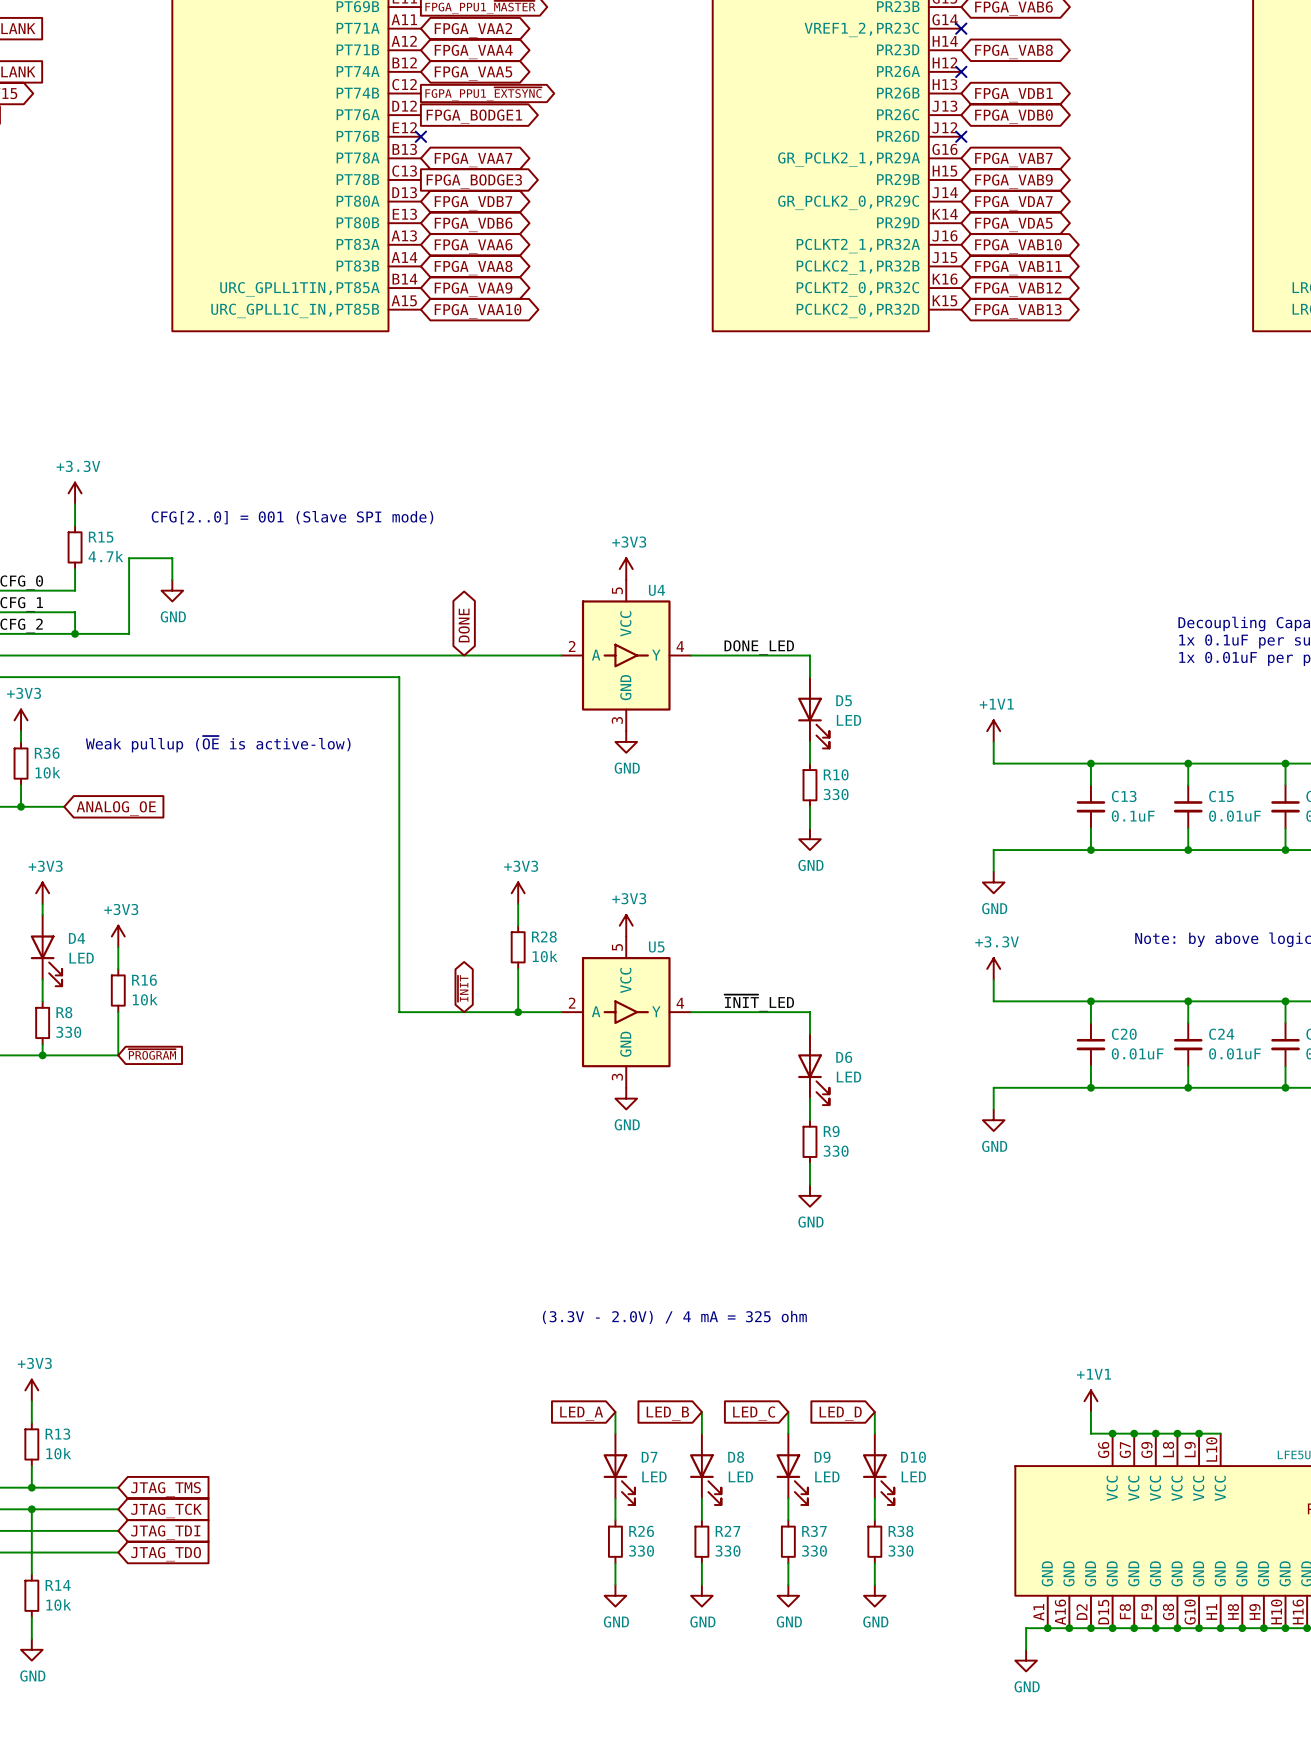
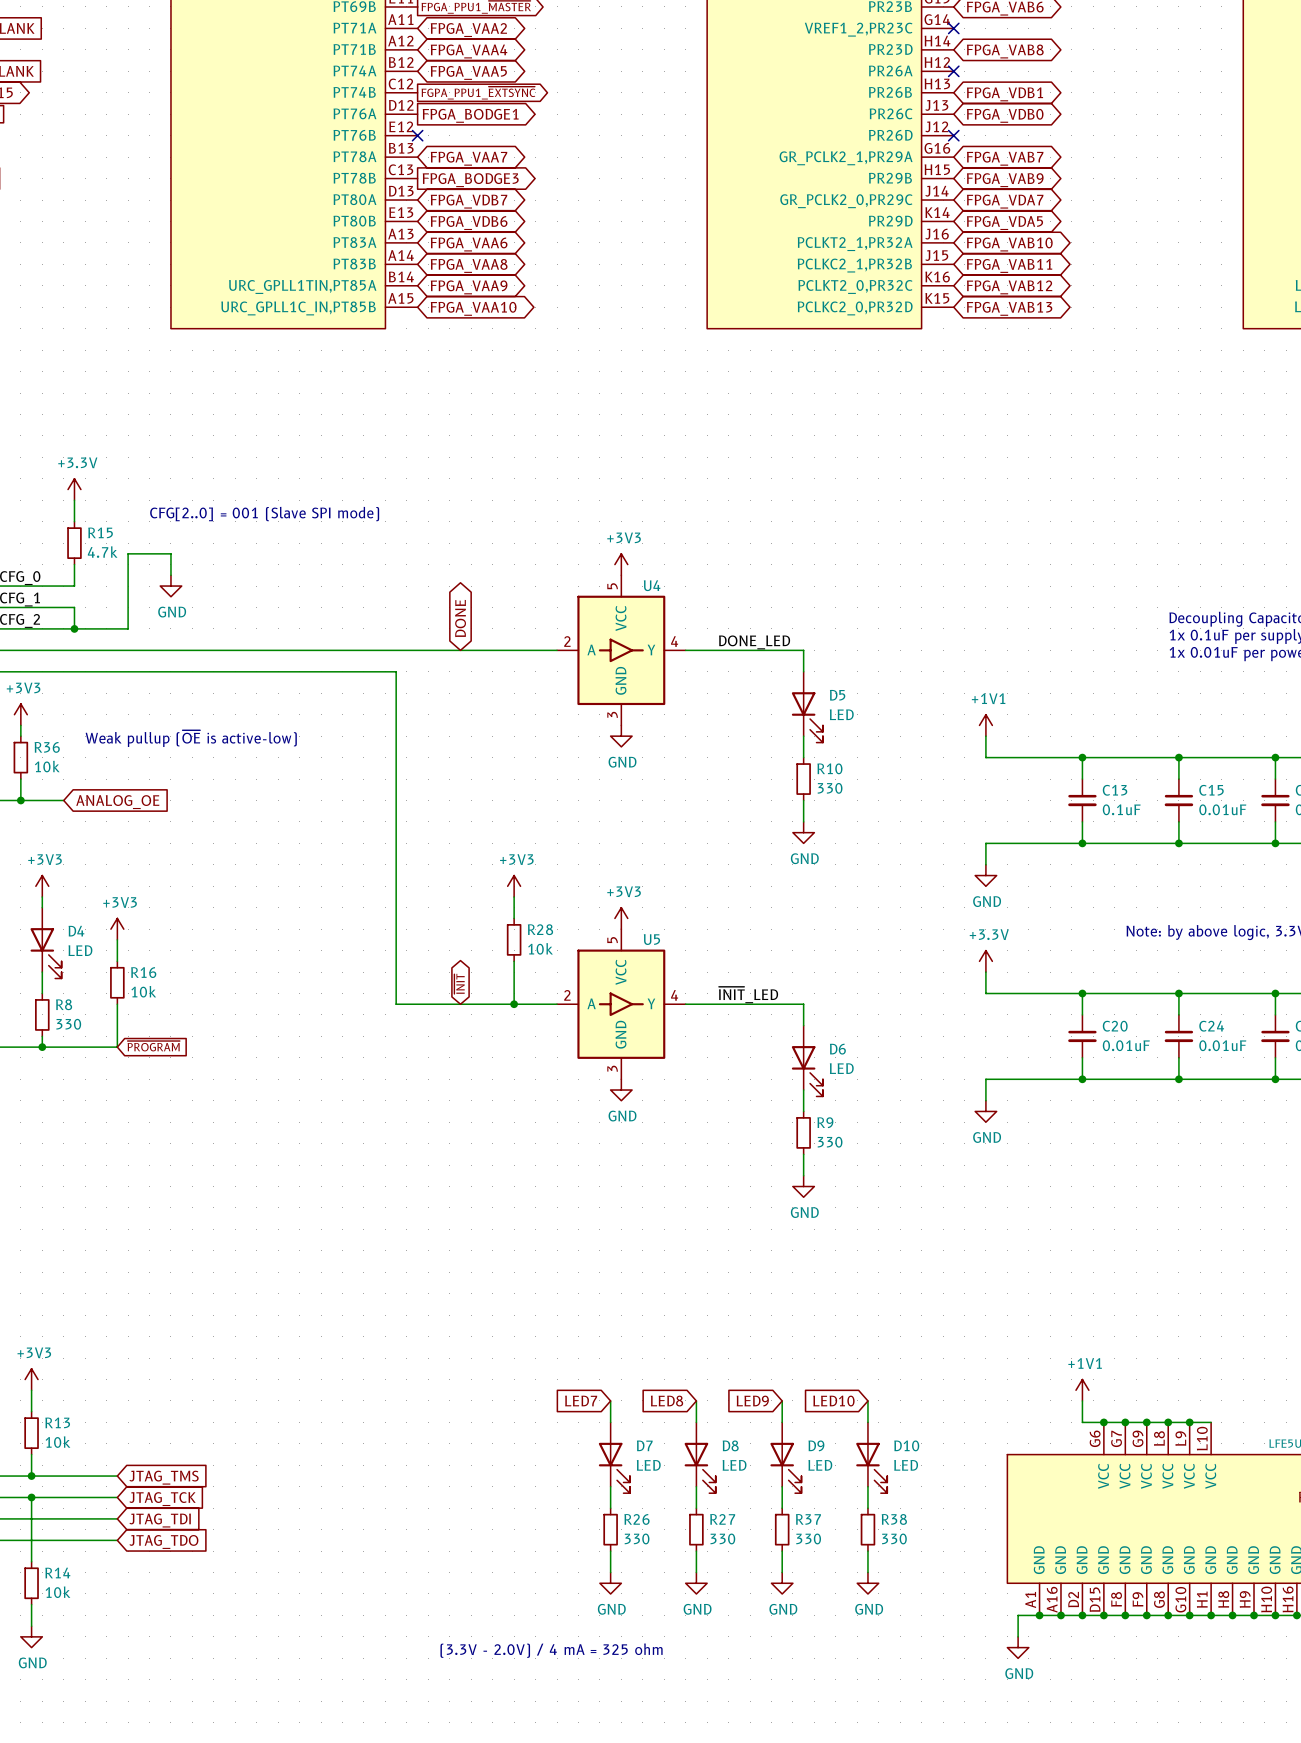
text: (3.3V - 2.0V) / 4 mA = 325 ohm (674, 1317) -> none
global label: LED_A (581, 1413) -> LED7 (581, 1400)
global label: LED_B (667, 1413) -> LED8 (667, 1401)
global label: LED_C (754, 1413) -> LED9 (752, 1401)
global label: LED_D (840, 1413) -> LED10 (833, 1401)
text: none -> (3.3V - 2.0V) / 4 mA = 325 ohm (551, 1650)

